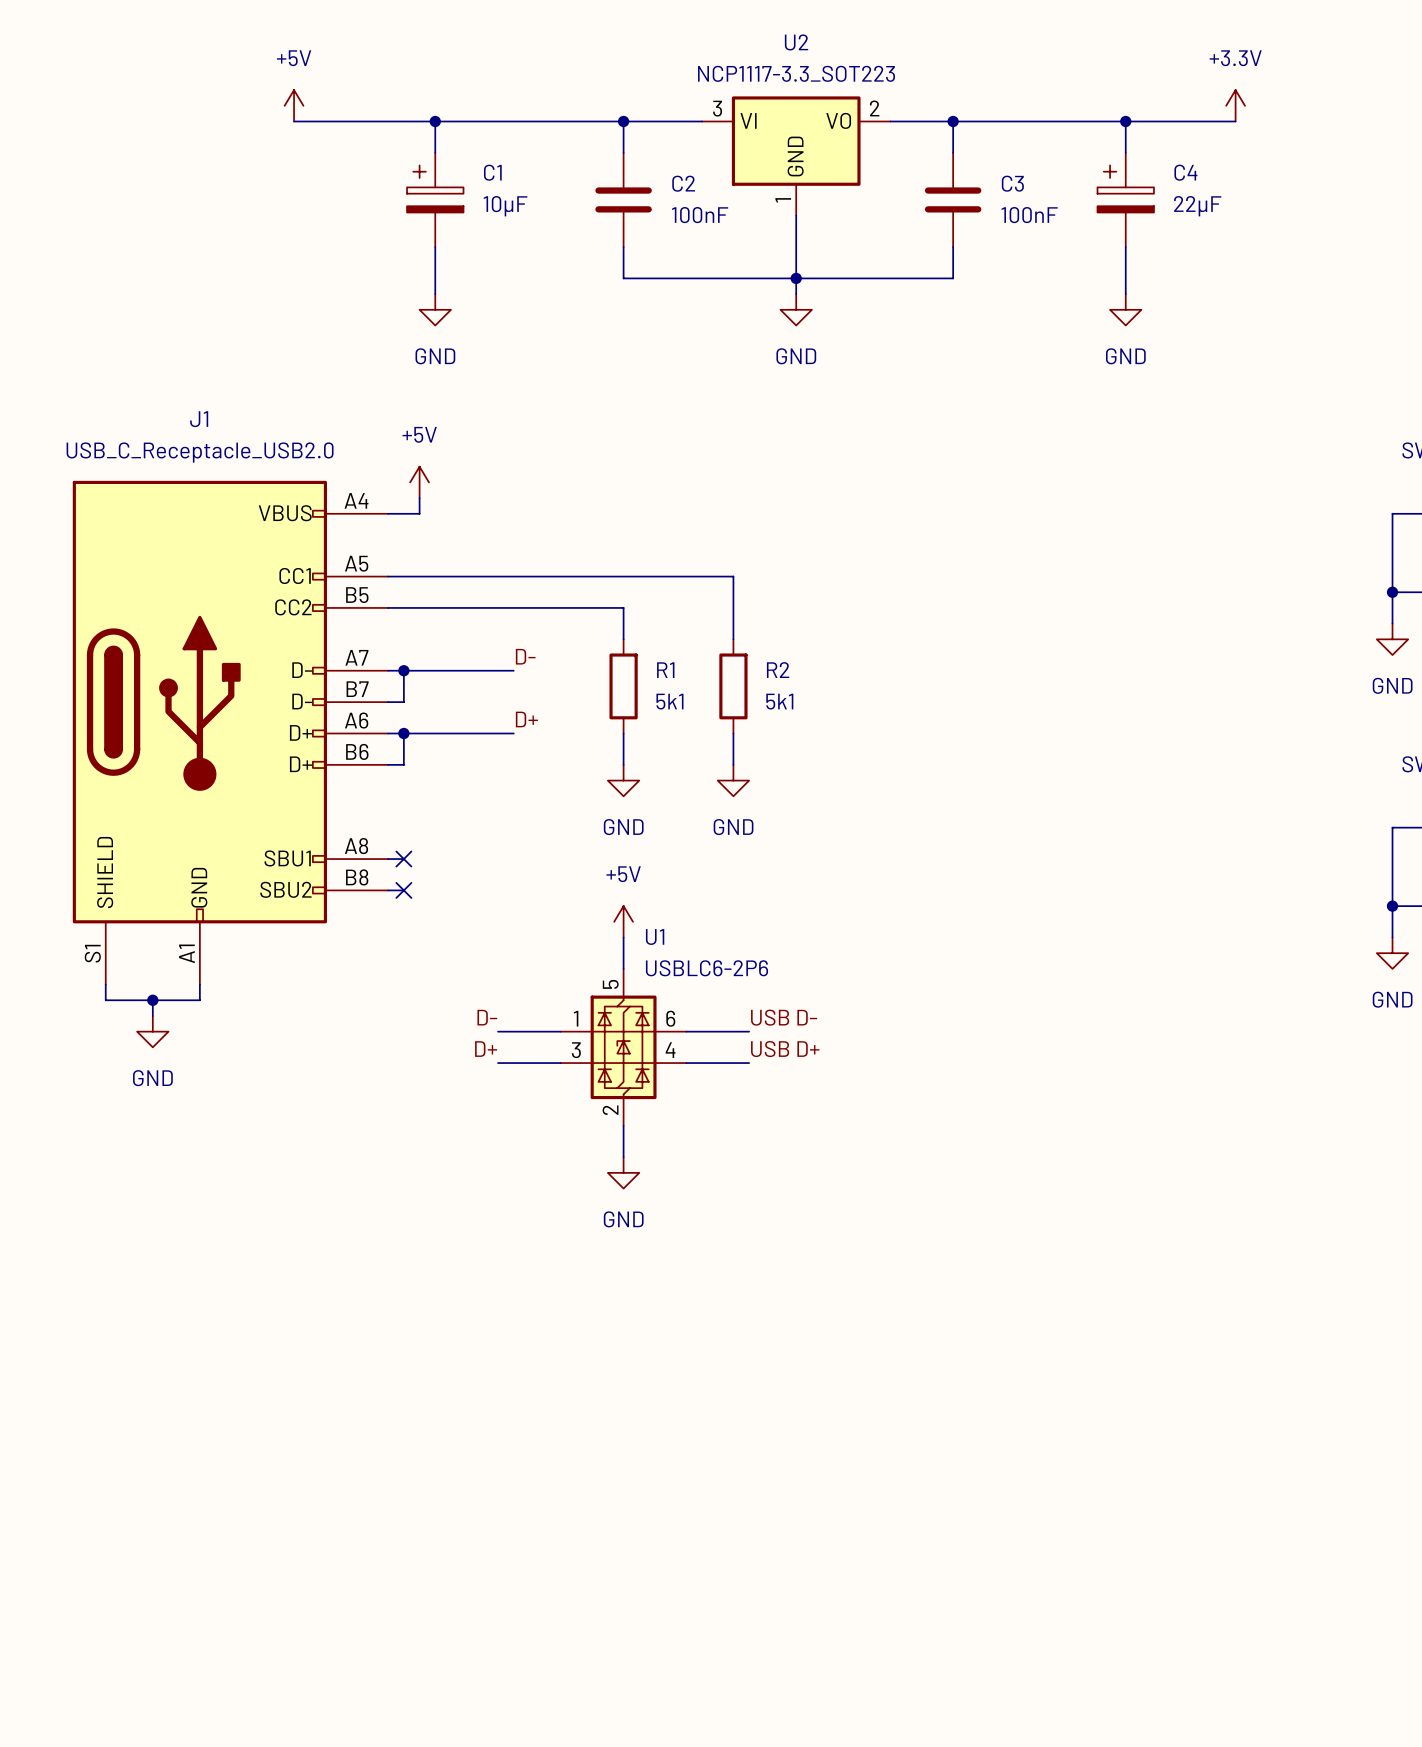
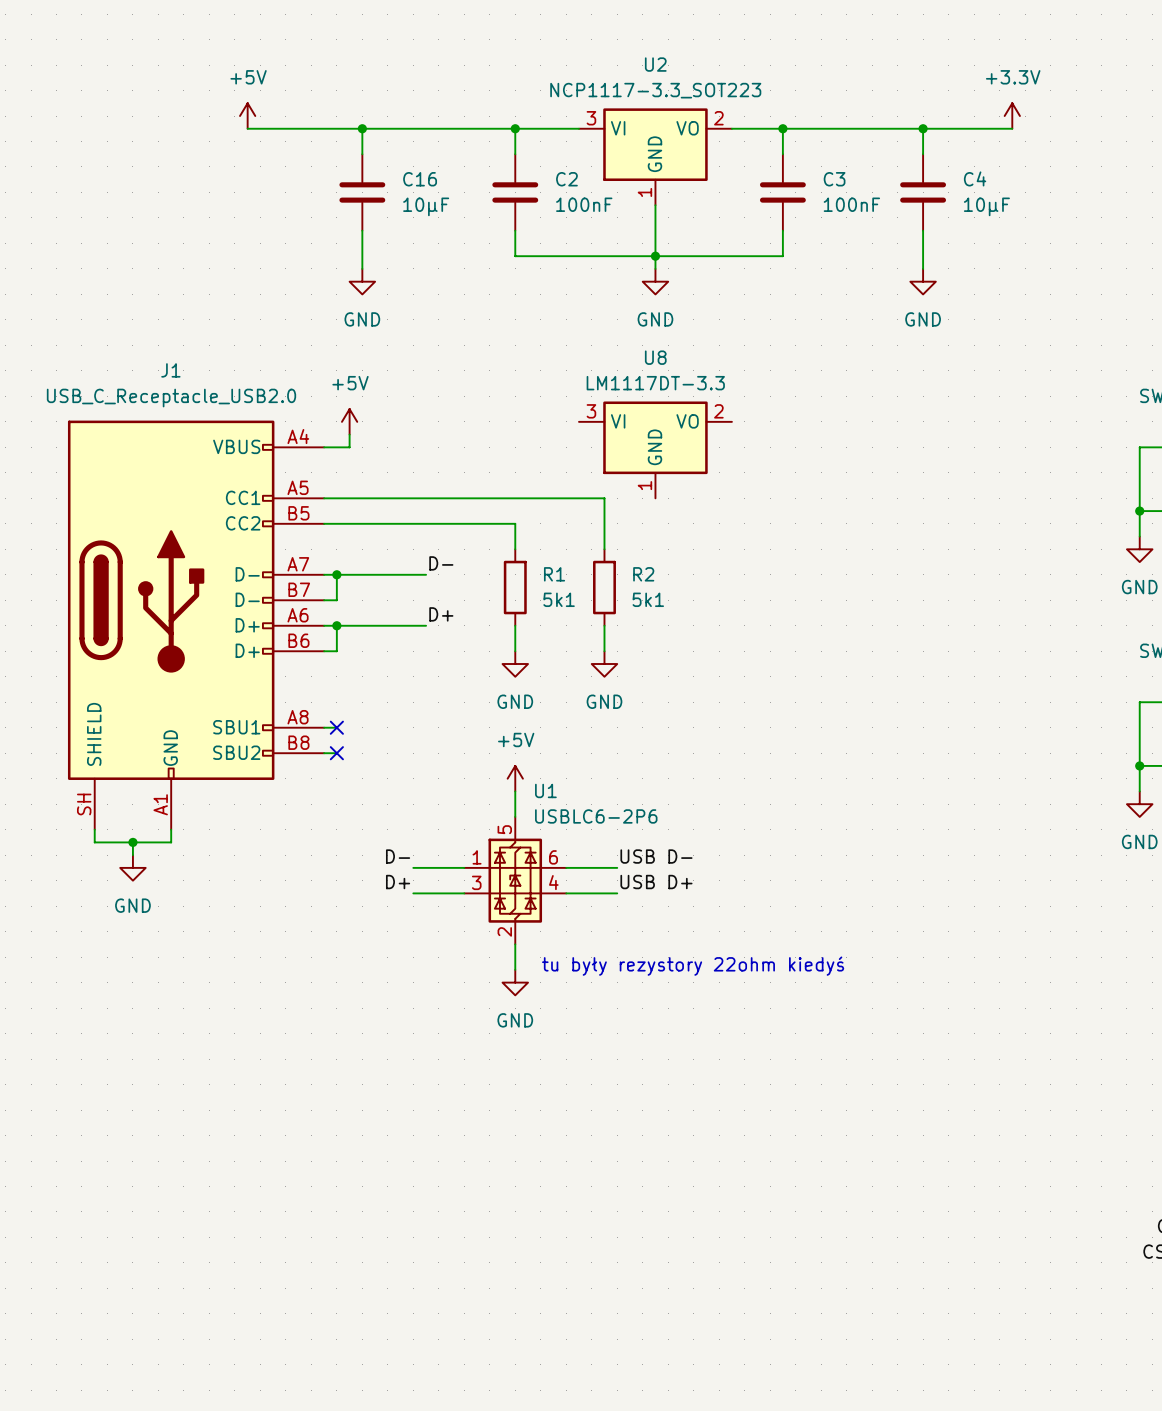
C4 symbol: [1097, 152, 1154, 248] -> [900, 154, 947, 231]
C1: 10μF (435, 199) -> none
C16: none -> 10μF (362, 192)
C4 value: 22μF (1197, 206) -> 10μF (986, 206)
U8: none -> LM1117DT-3.3 (655, 449)
J1 pin number: S1 (92, 953) -> SH (84, 804)
text: none -> tu były rezystory 22ohm kiedyś (693, 966)

